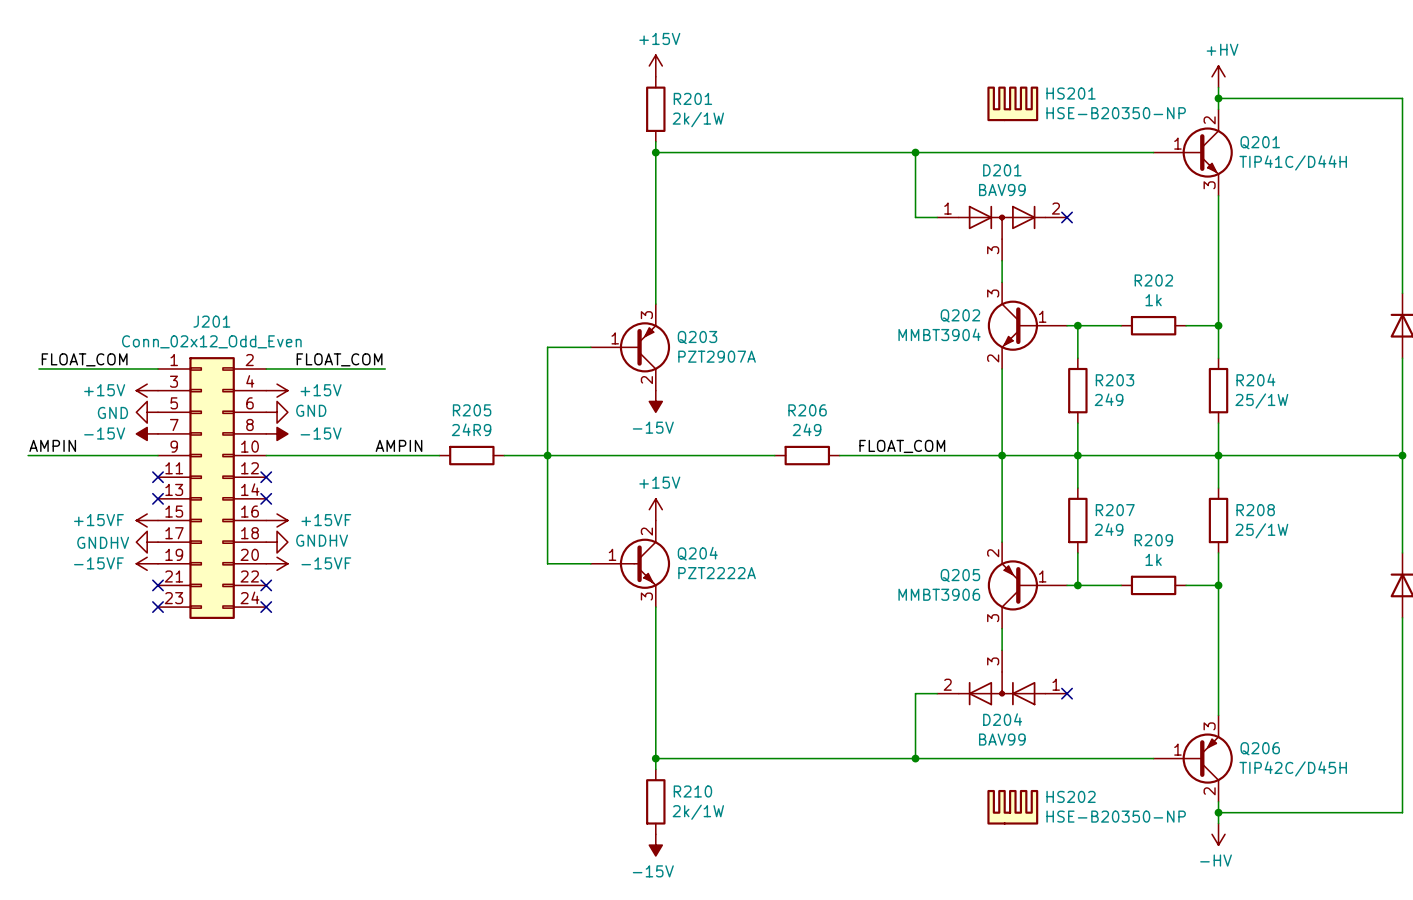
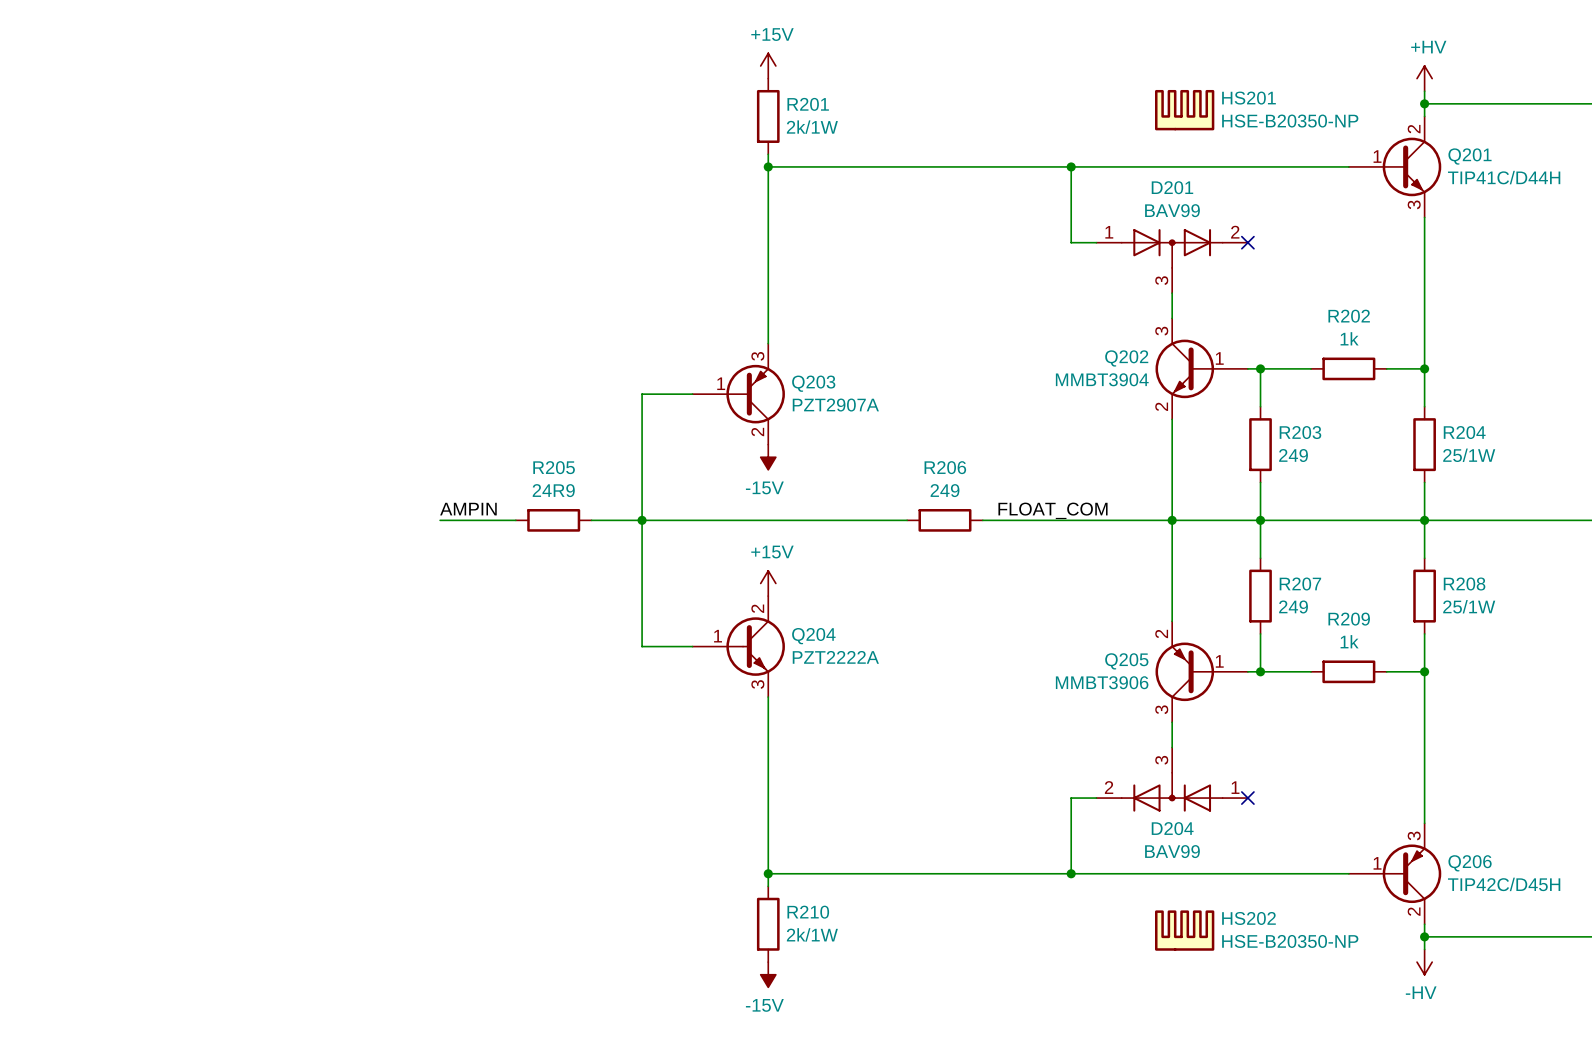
label: FLOAT_COM (84, 359) -> none
label: FLOAT_COM (339, 359) -> none
wire: (38, 368) (158, 368) -> none
wire: (266, 368) (385, 368) -> none
power symbol: +15V (147, 390) -> none
power symbol: +15V (277, 390) -> none
power symbol: GND (147, 412) -> none
power symbol: GND (277, 412) -> none
power symbol: -15V (147, 433) -> none
power symbol: -15V (277, 433) -> none
label: AMPIN (52, 445) -> none
wire: (28, 455) (158, 455) -> none
wire: (266, 455) (374, 455) -> none
no-connect mark: (158, 477) -> none
no-connect mark: (266, 477) -> none
J201: Conn_02x12_Odd_Even (212, 488) -> none
no-connect mark: (158, 498) -> none
no-connect mark: (266, 498) -> none
power symbol: +15VF (147, 520) -> none
power symbol: +15VF (277, 520) -> none
power symbol: GNDHV (147, 542) -> none
power symbol: GNDHV (277, 542) -> none
power symbol: -15VF (147, 563) -> none
power symbol: -15VF (277, 563) -> none
no-connect mark: (158, 585) -> none
no-connect mark: (266, 585) -> none
no-connect mark: (158, 607) -> none
no-connect mark: (266, 607) -> none

